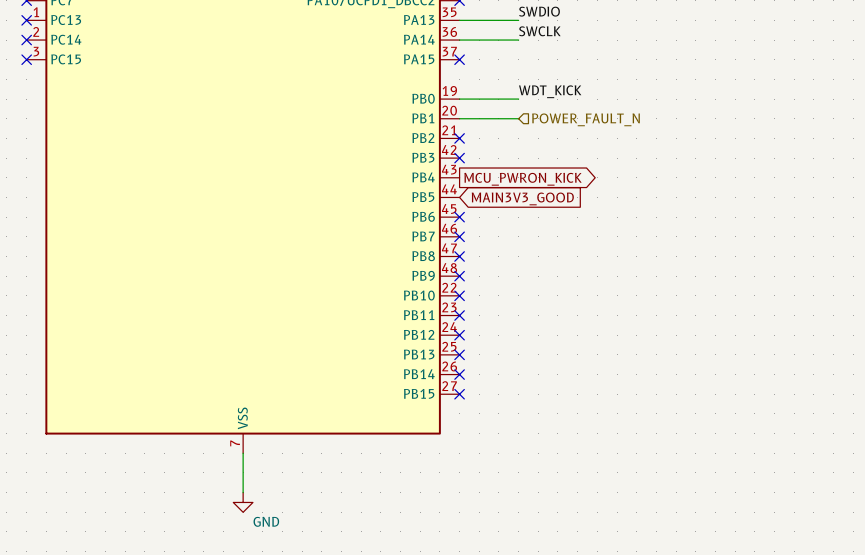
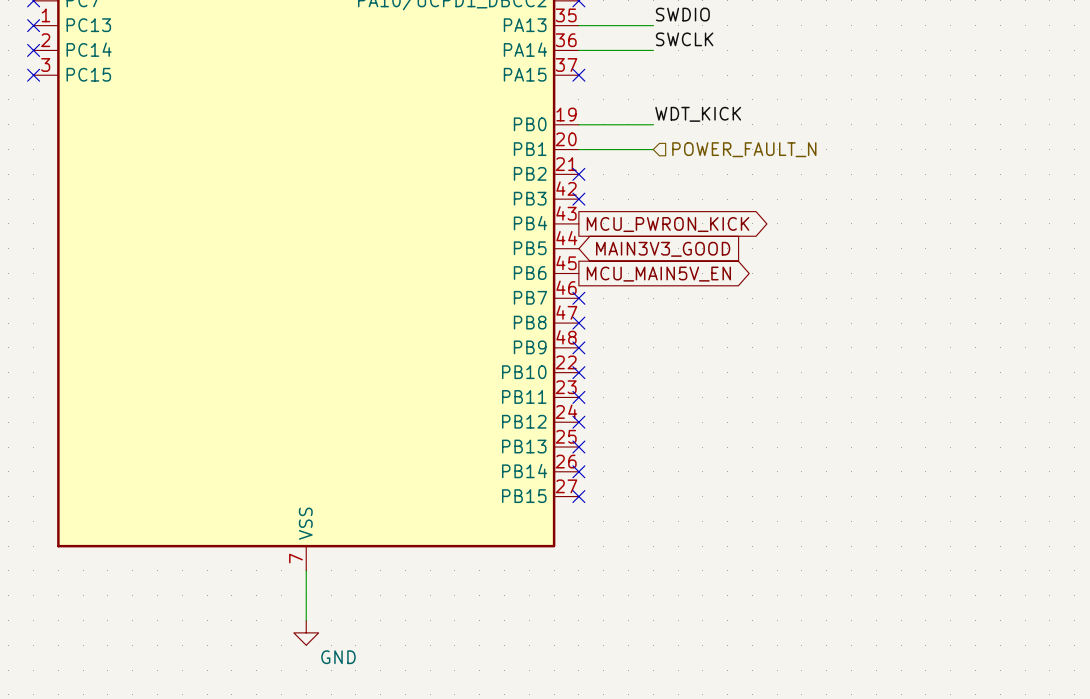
no-connect mark: (459, 217) -> none
global label: none -> MCU_MAIN5V_EN (658, 274)

